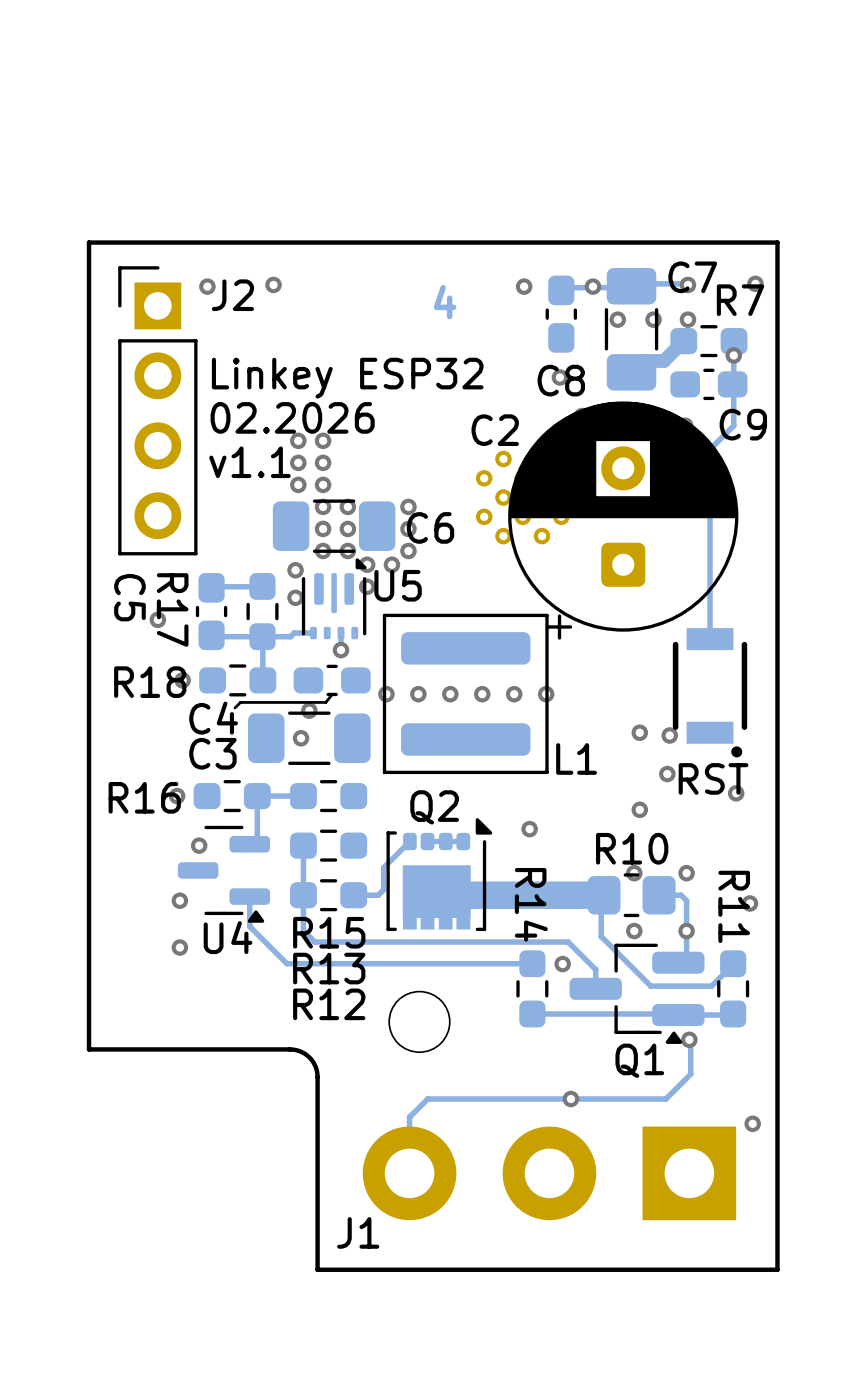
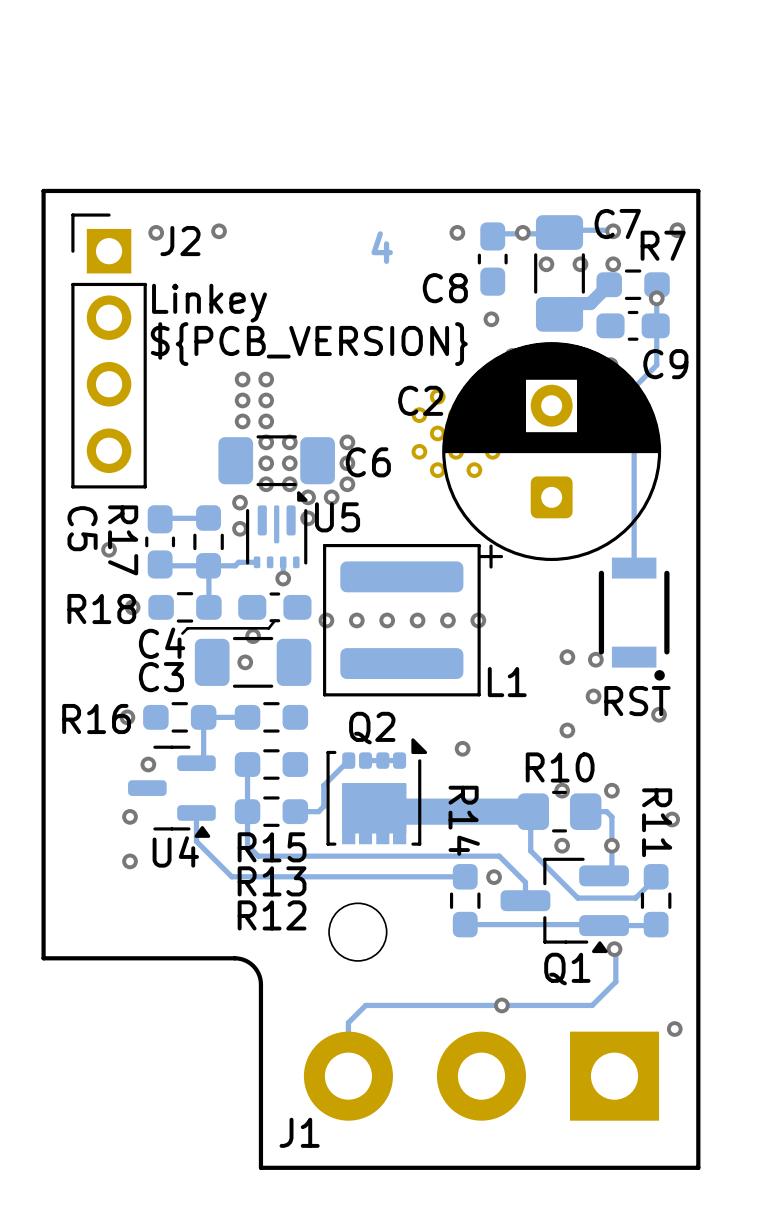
text: none -> Linkey (209, 303)
text: Linkey ESP32 (347, 378) -> ${PCB_VERSION} (309, 344)
C8 name position: C8 (561, 380) -> C8 (445, 288)
text: 02.2026 (292, 417) -> none
C2 name position: C2 (495, 430) -> C2 (420, 400)
text: v1.1 (250, 462) -> none

